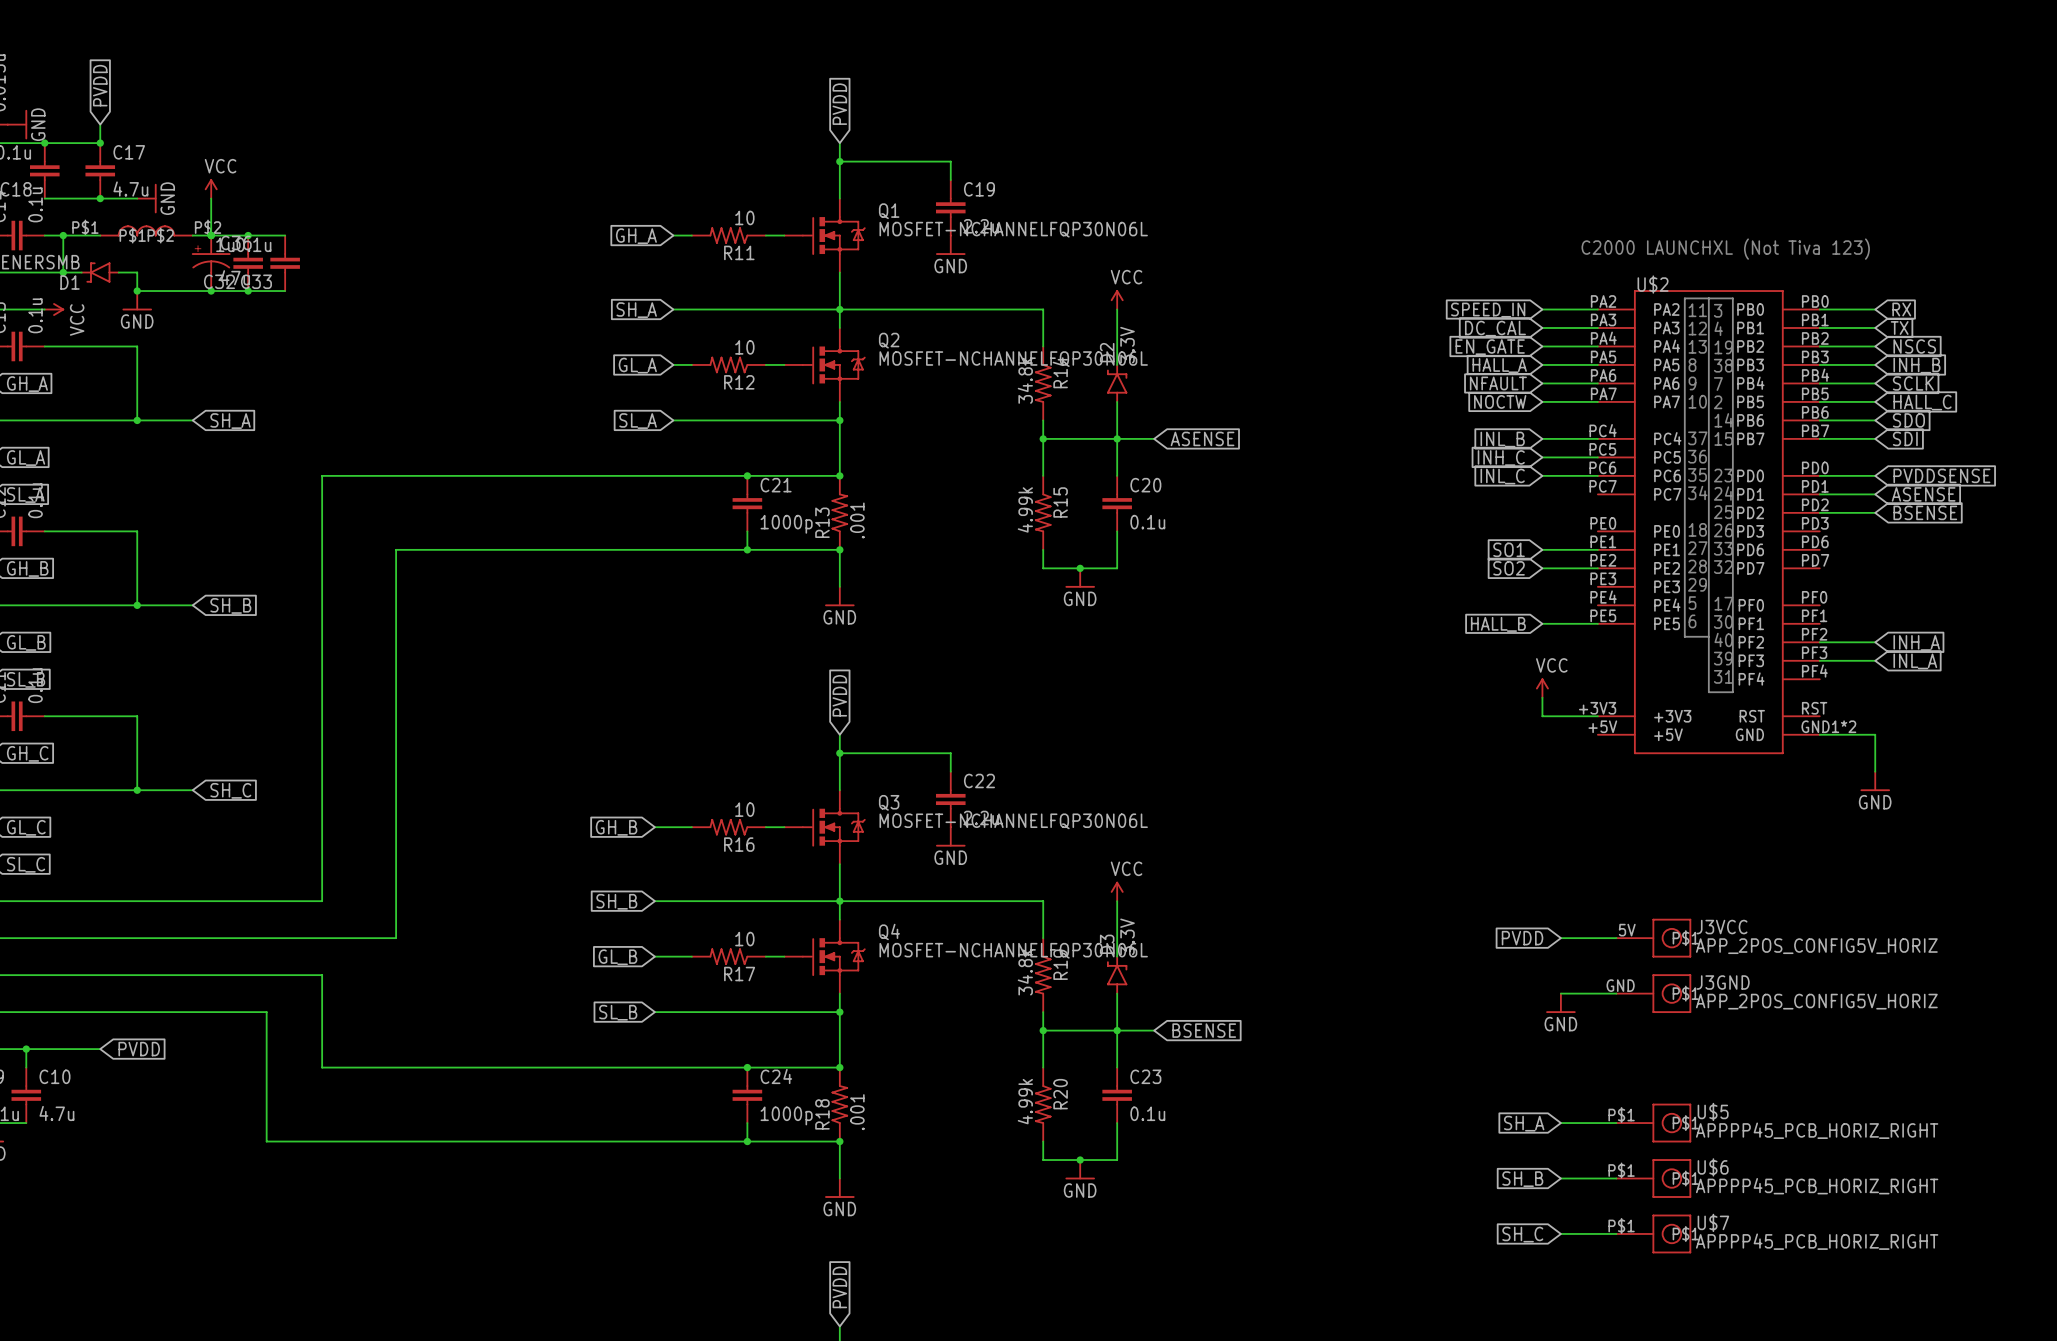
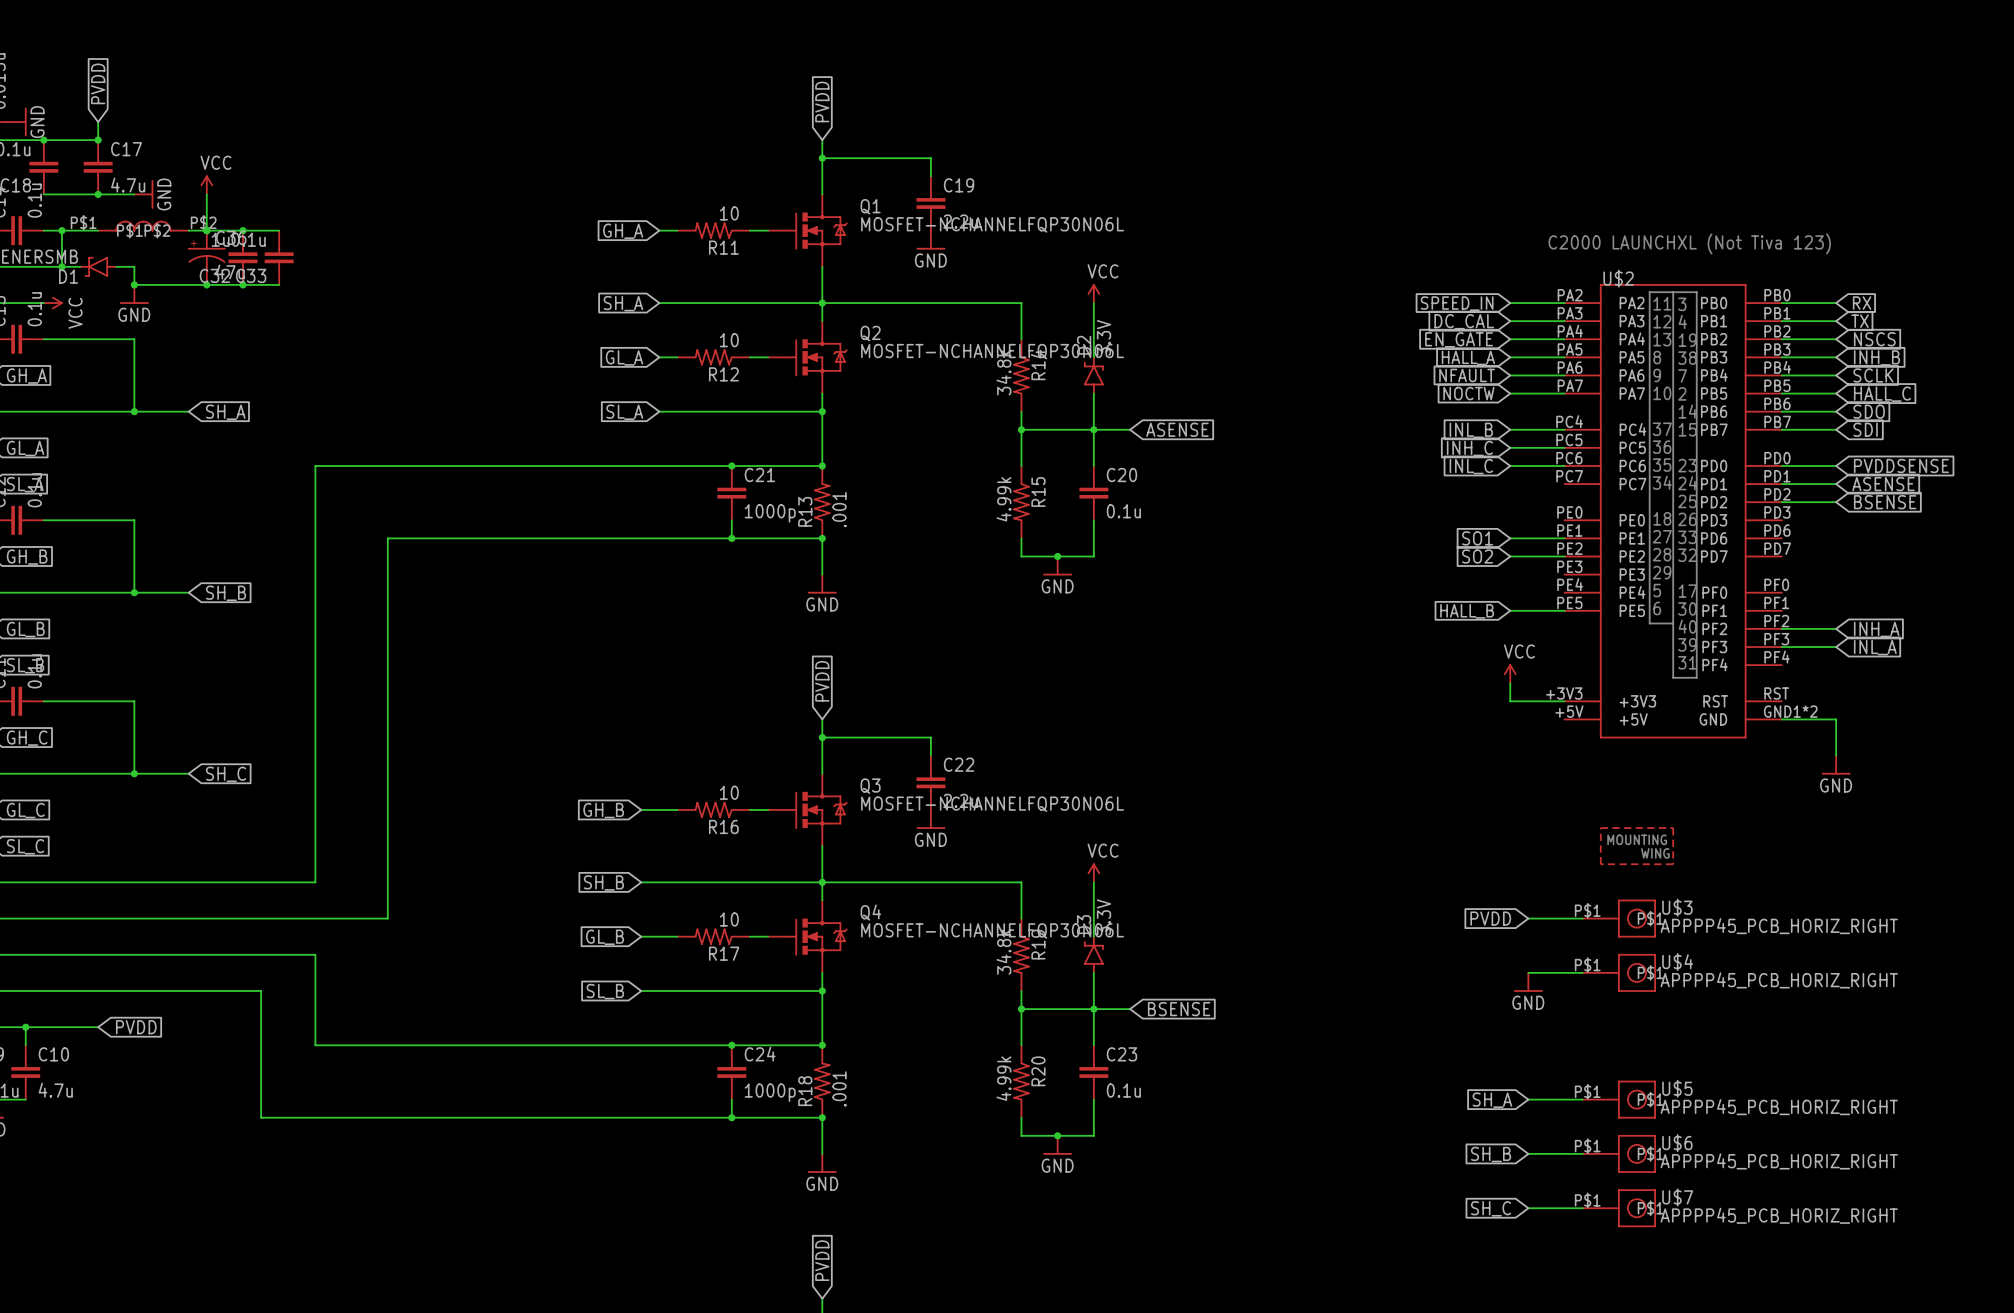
part: none -> (1636, 846)
J3VCC name: J3VCC (1721, 927) -> U$3 (1677, 907)
J3VCC pin number: 5V (1627, 930) -> P$1 (1587, 910)
J3VCC value: APP_2POS_CONFIG5V_HORIZ (1816, 946) -> APPPP45_PCB_HORIZ_RIGHT (1779, 926)
J3GND name: J3GND (1723, 982) -> U$4 (1677, 962)
J3GND pin number: GND (1620, 985) -> P$1 (1587, 965)
J3GND value: APP_2POS_CONFIG5V_HORIZ (1816, 1001) -> APPPP45_PCB_HORIZ_RIGHT (1779, 980)

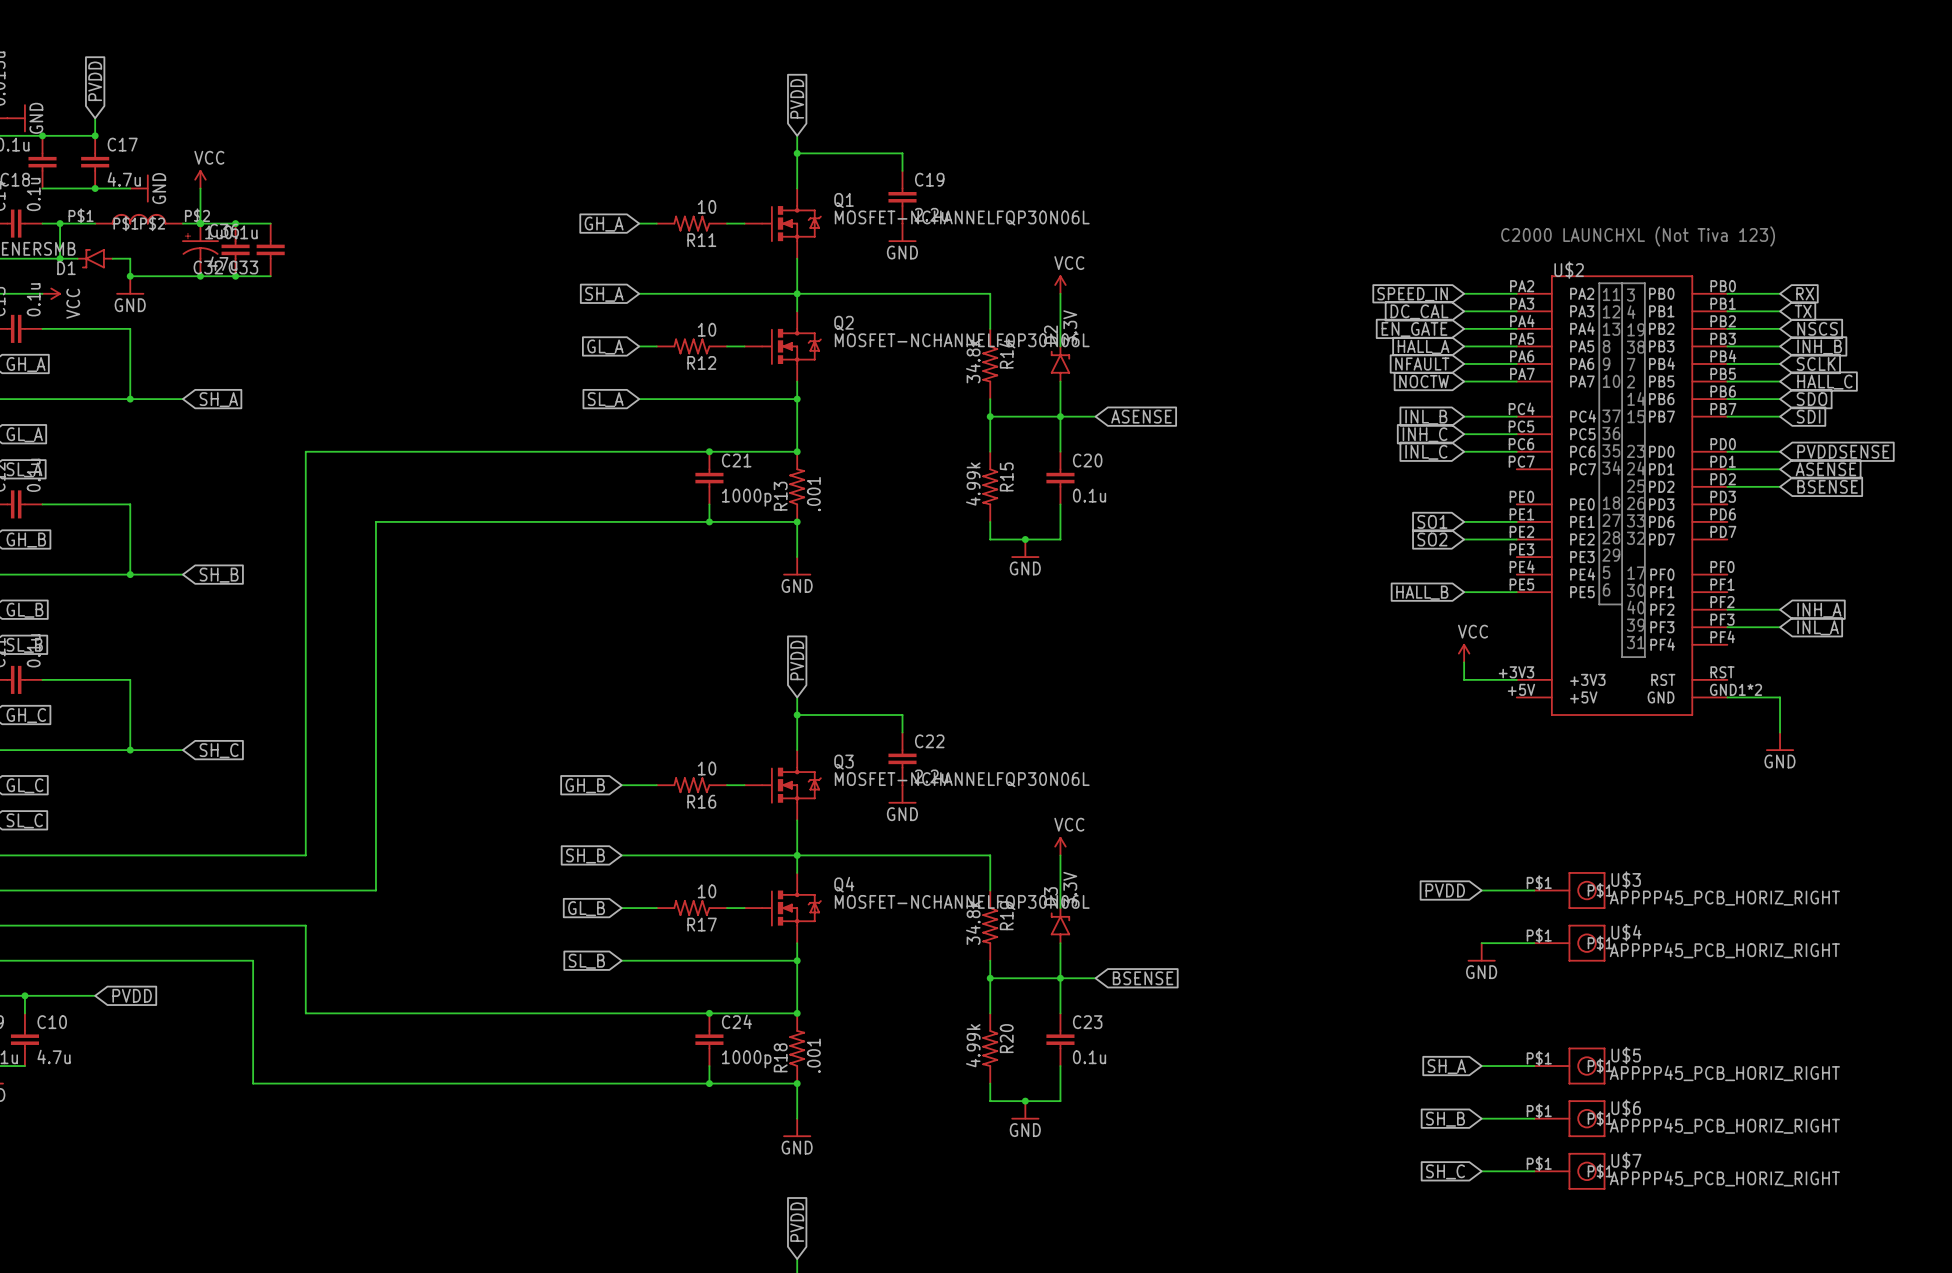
part: (1636, 846) -> none

